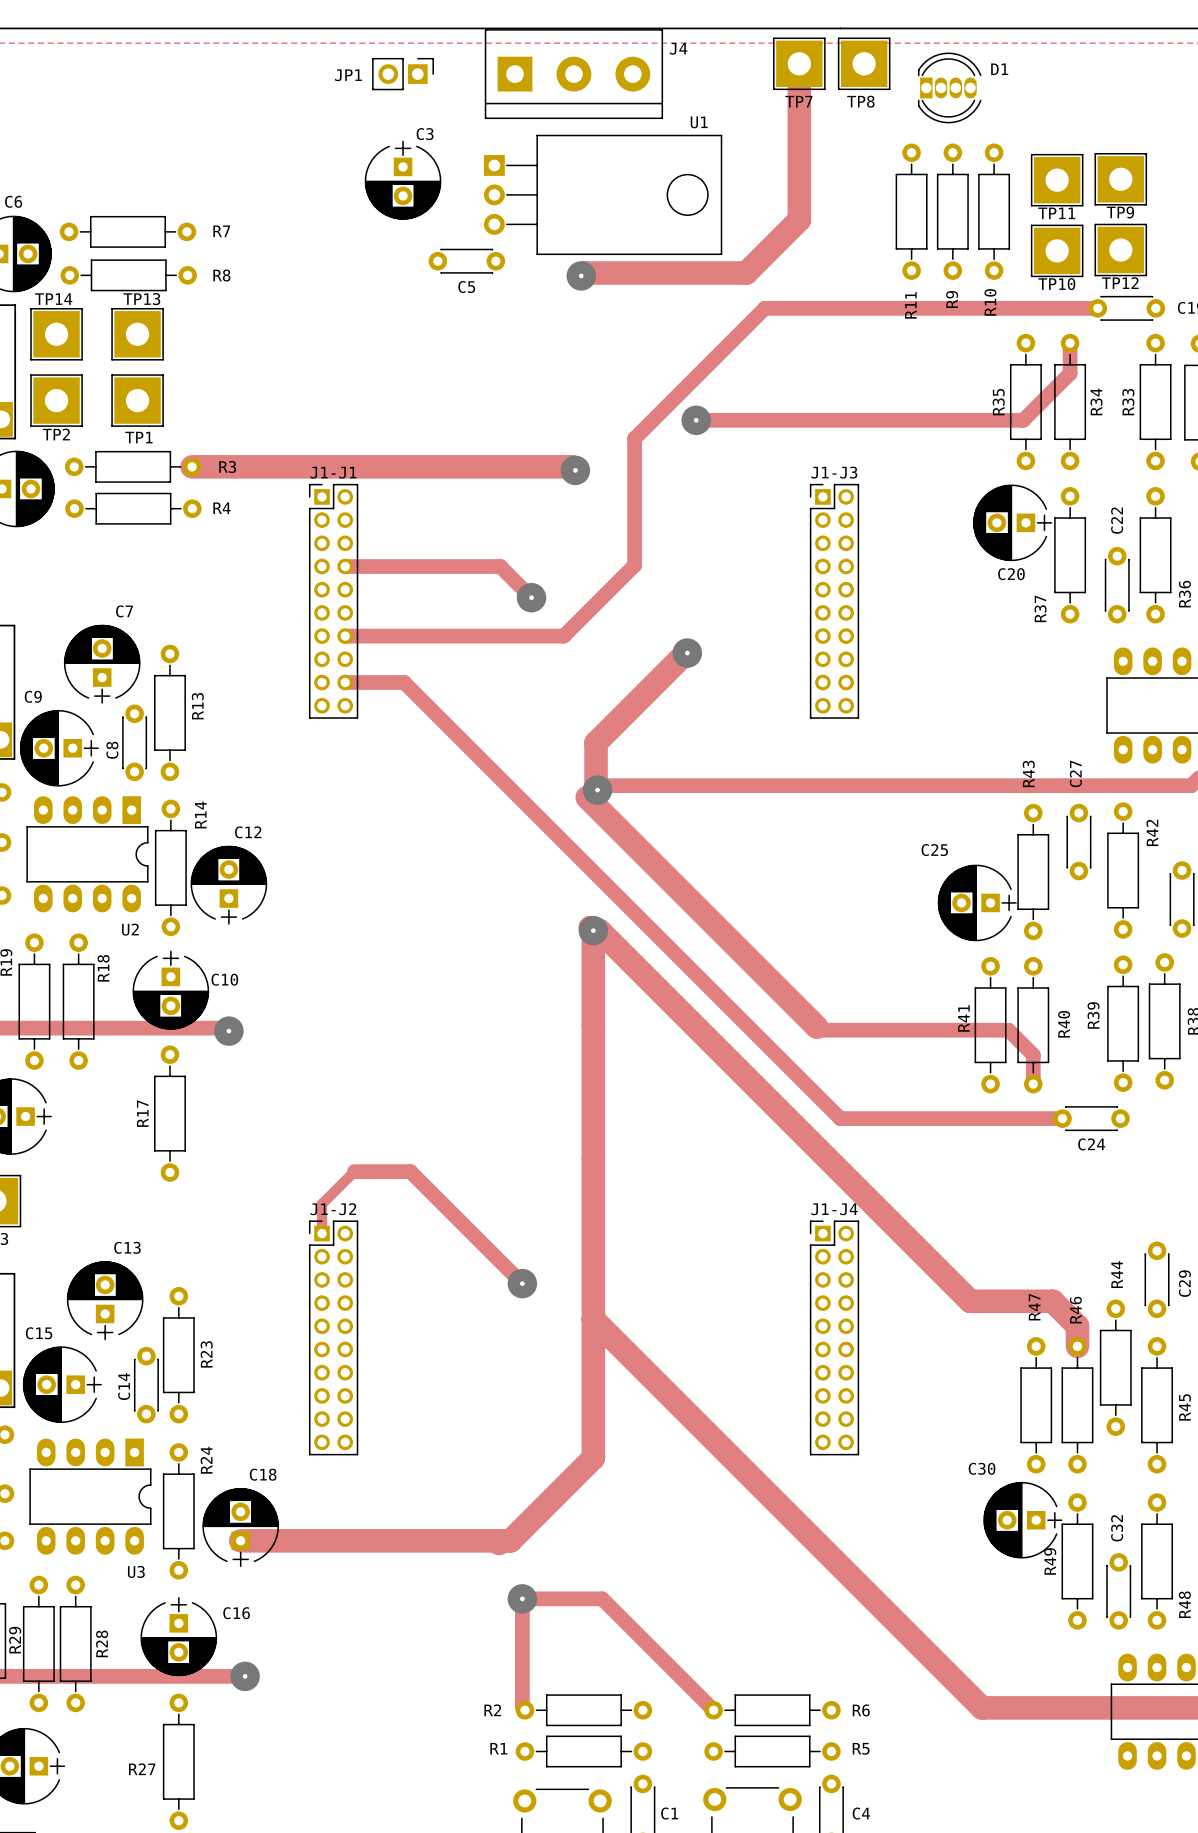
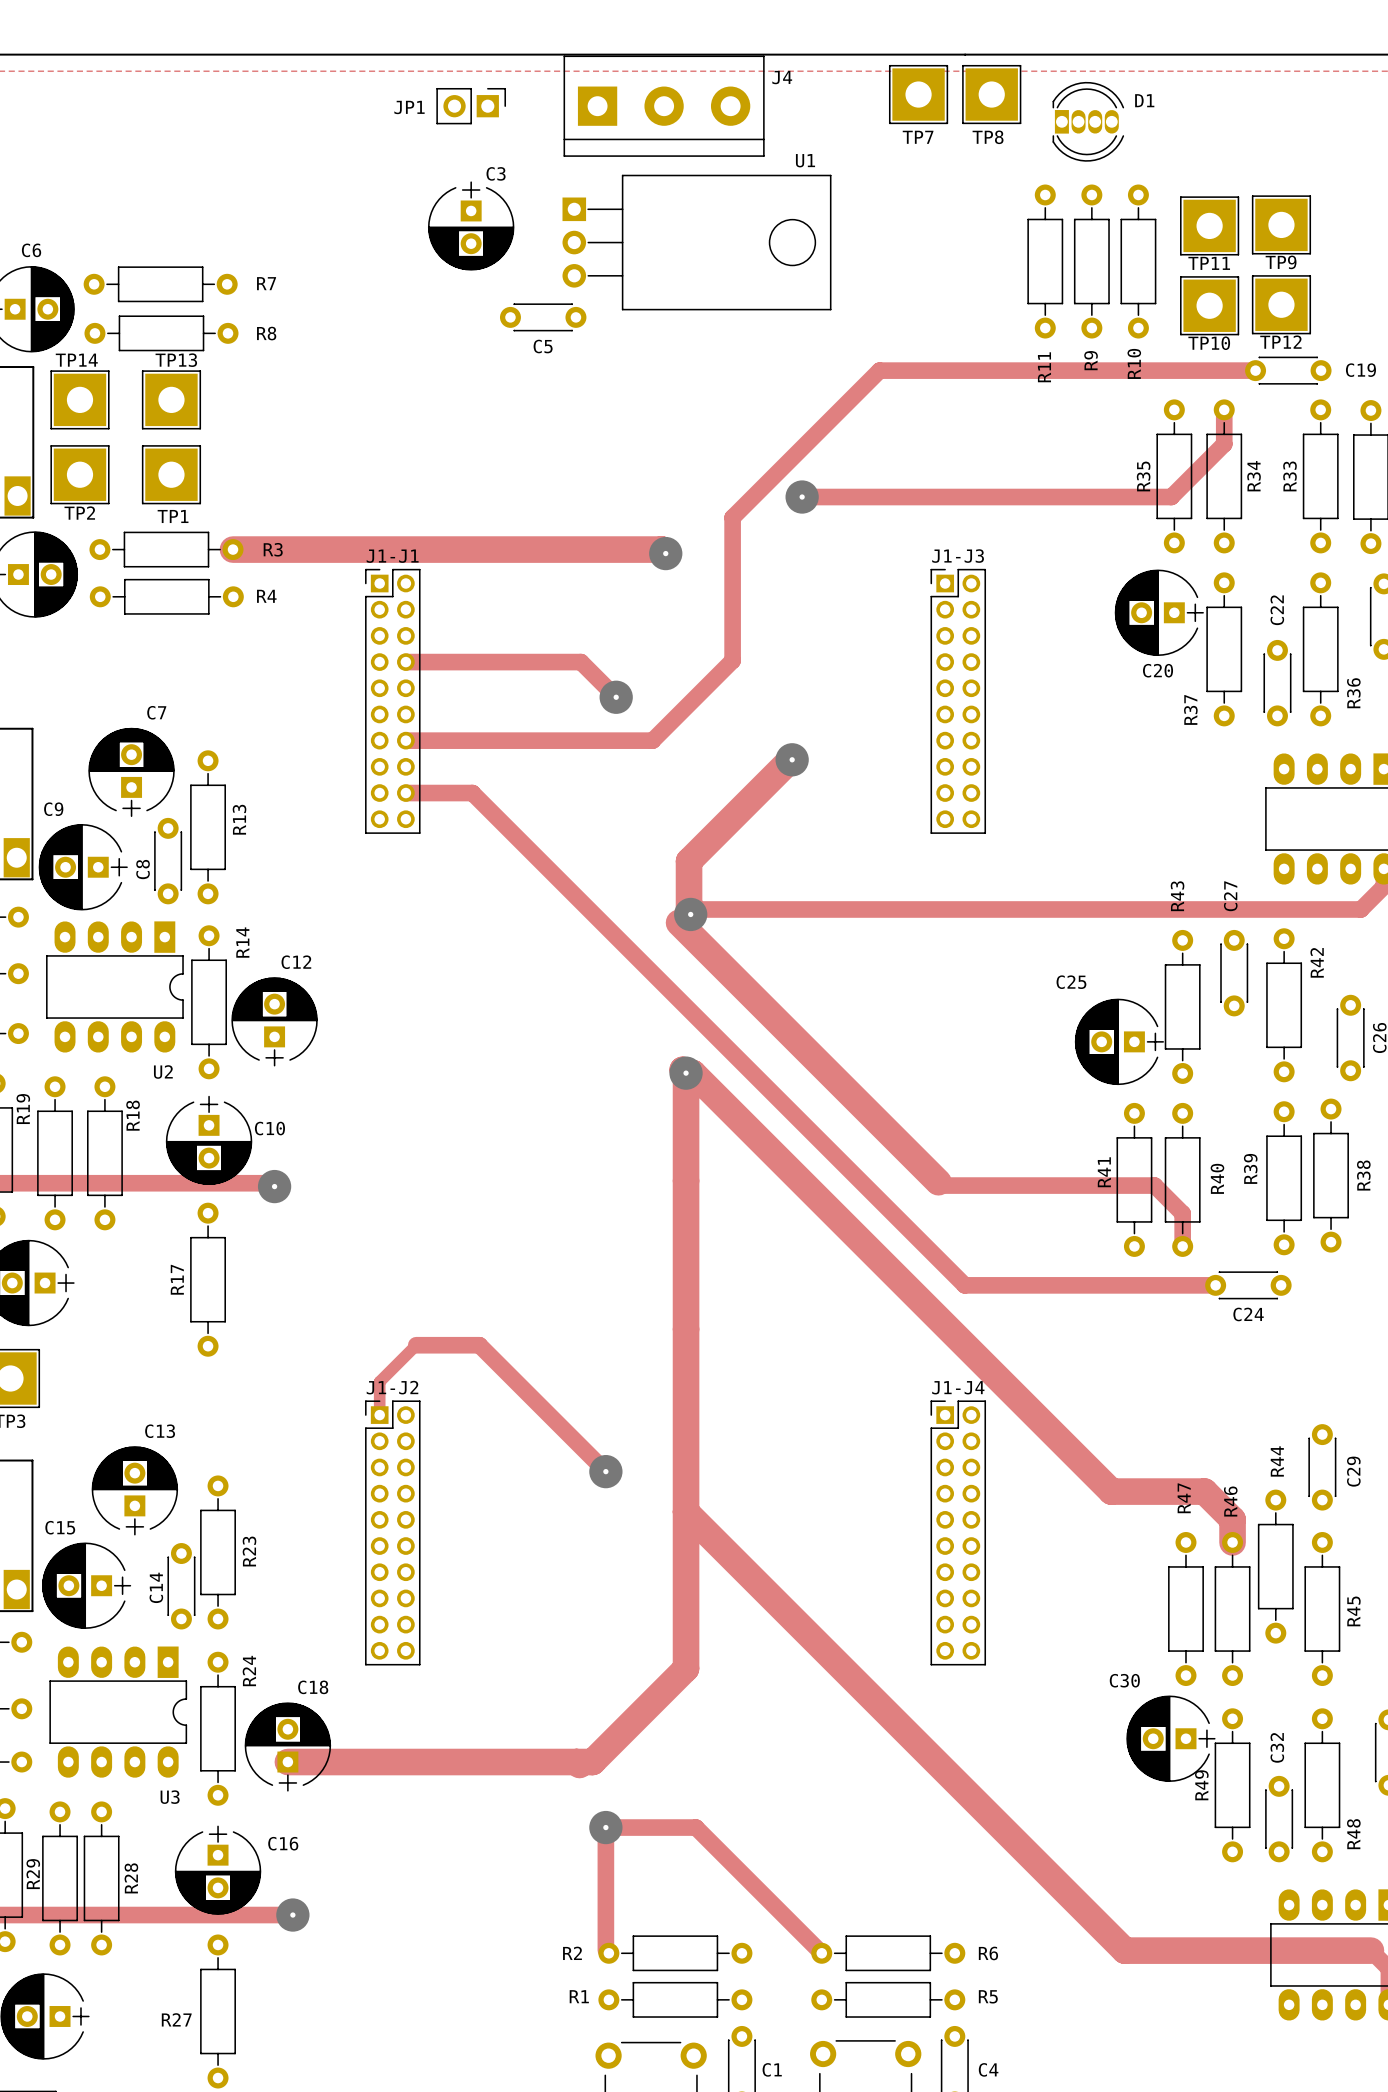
track: (799, 63) (799, 219) (746, 272) (584, 272) (581, 275) -> none
via: (581, 275) -> none

